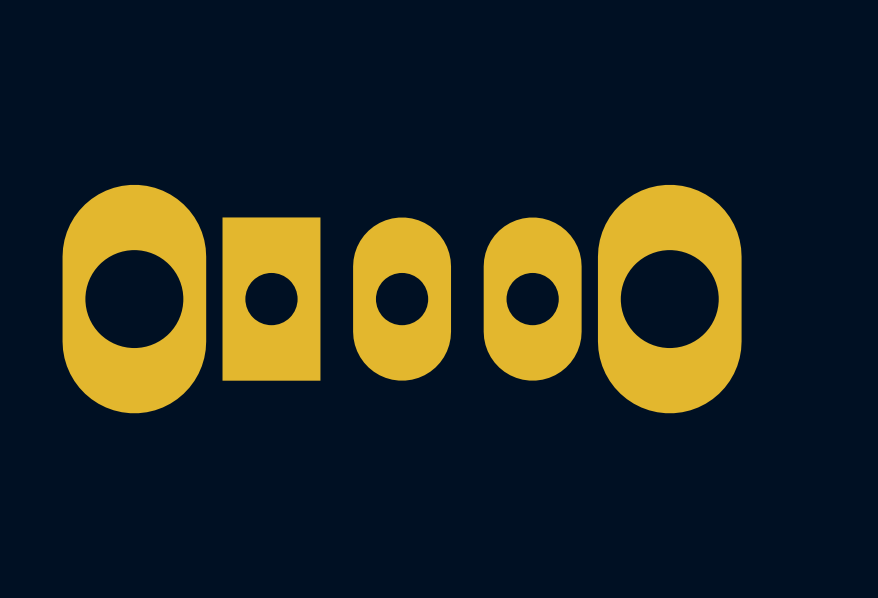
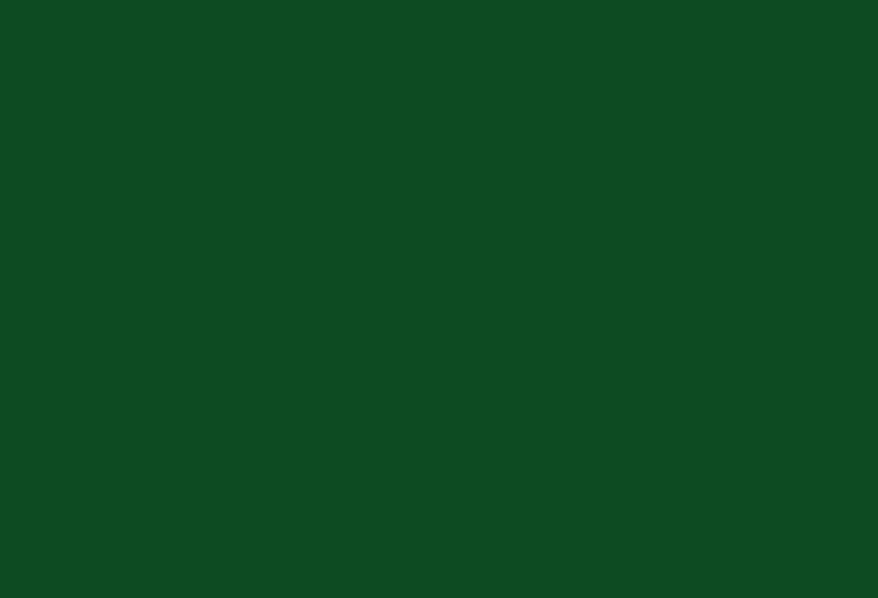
part: (402, 299) -> none

